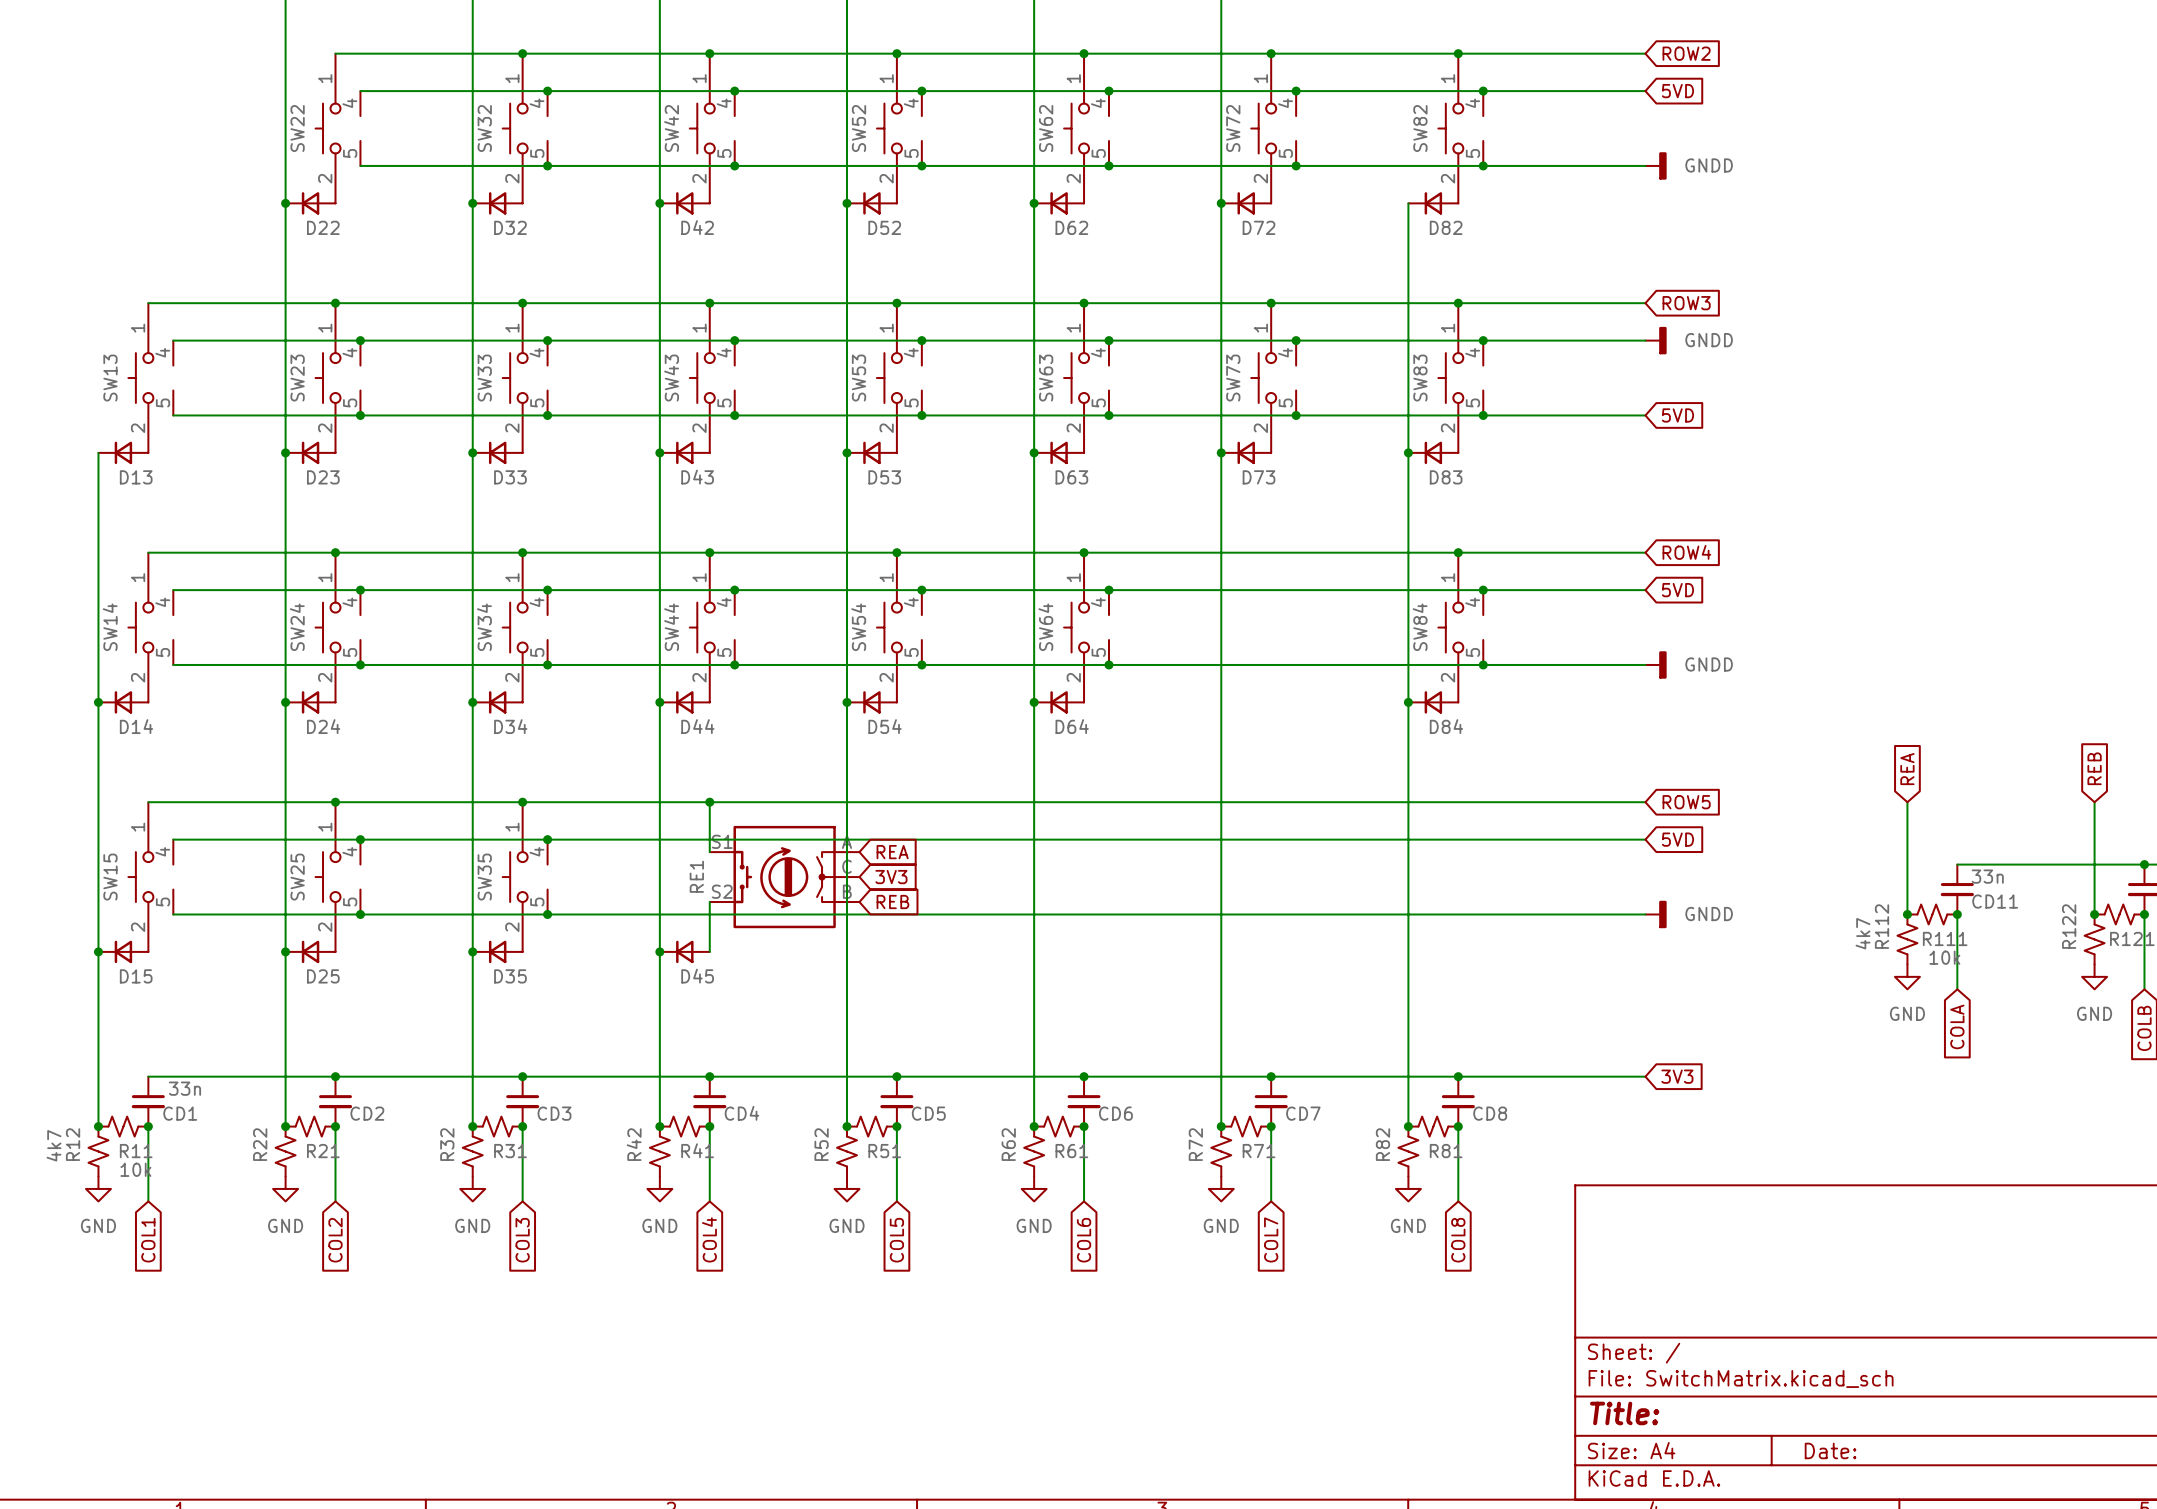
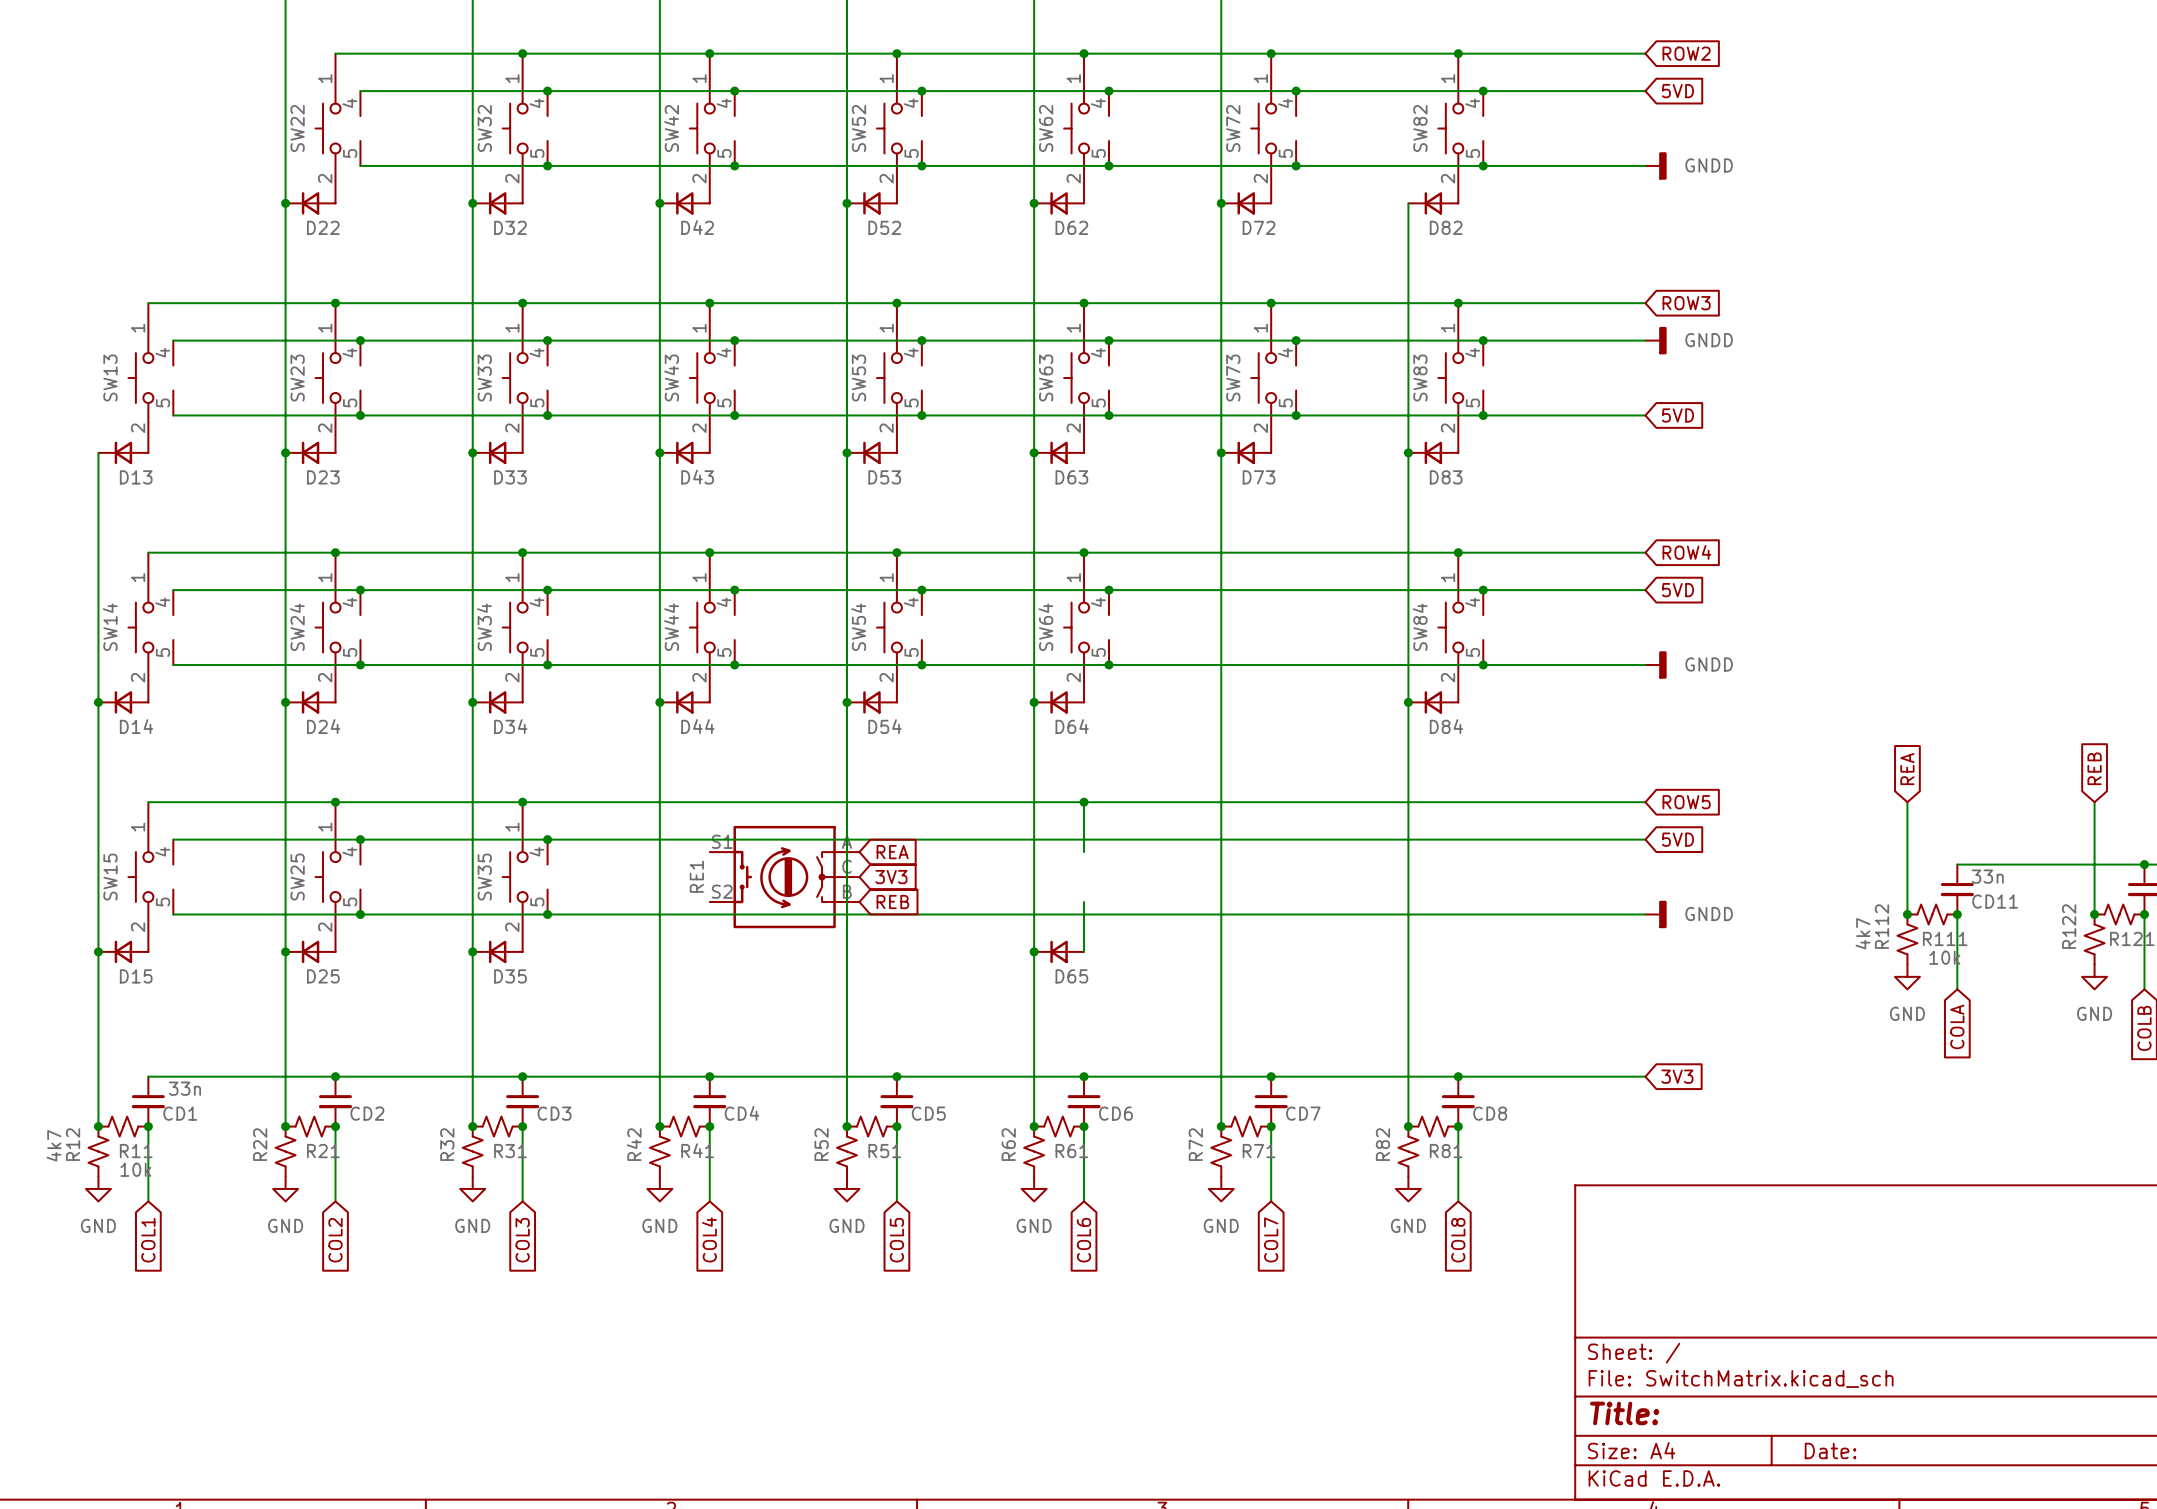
wire: (709, 802) (709, 852) -> none
junction: (709, 802) -> none
wire: none -> (1084, 802) (1084, 852)
junction: none -> (1084, 802)
wire: (709, 902) (709, 951) -> none
wire: none -> (1084, 902) (1084, 951)
junction: (659, 951) -> none
D45: (684, 951) -> none
junction: none -> (1034, 951)
D65: none -> (1059, 951)

